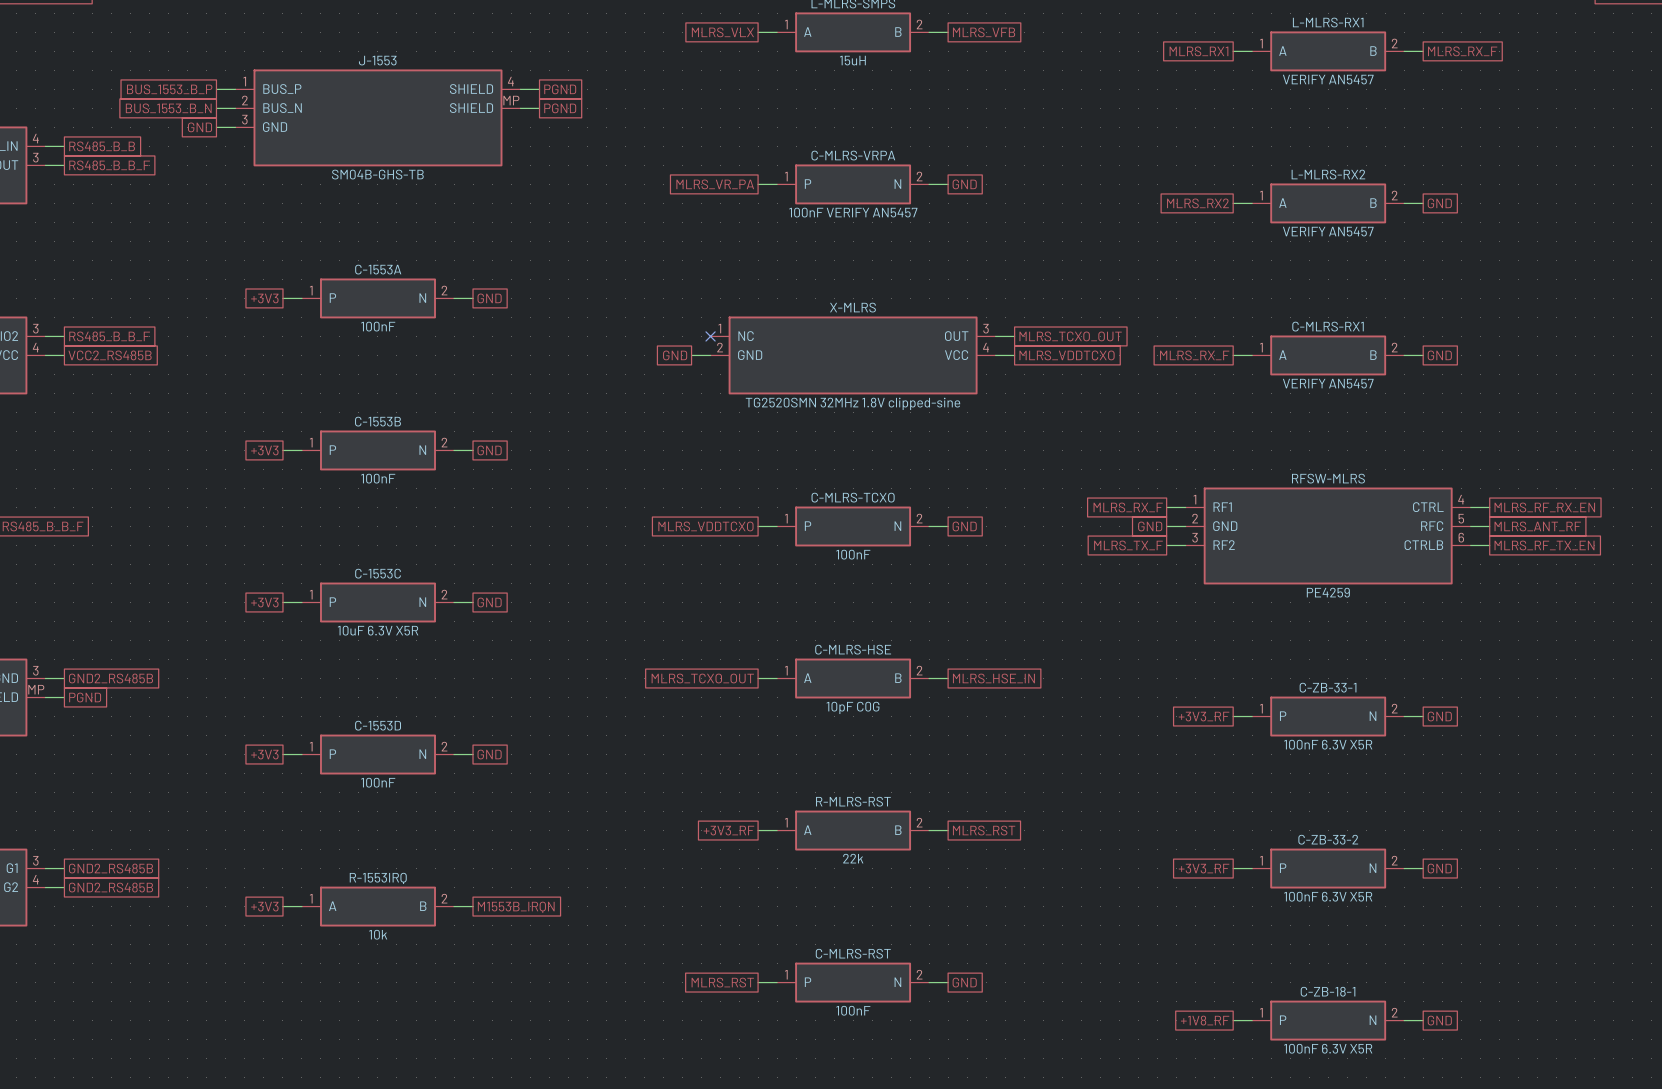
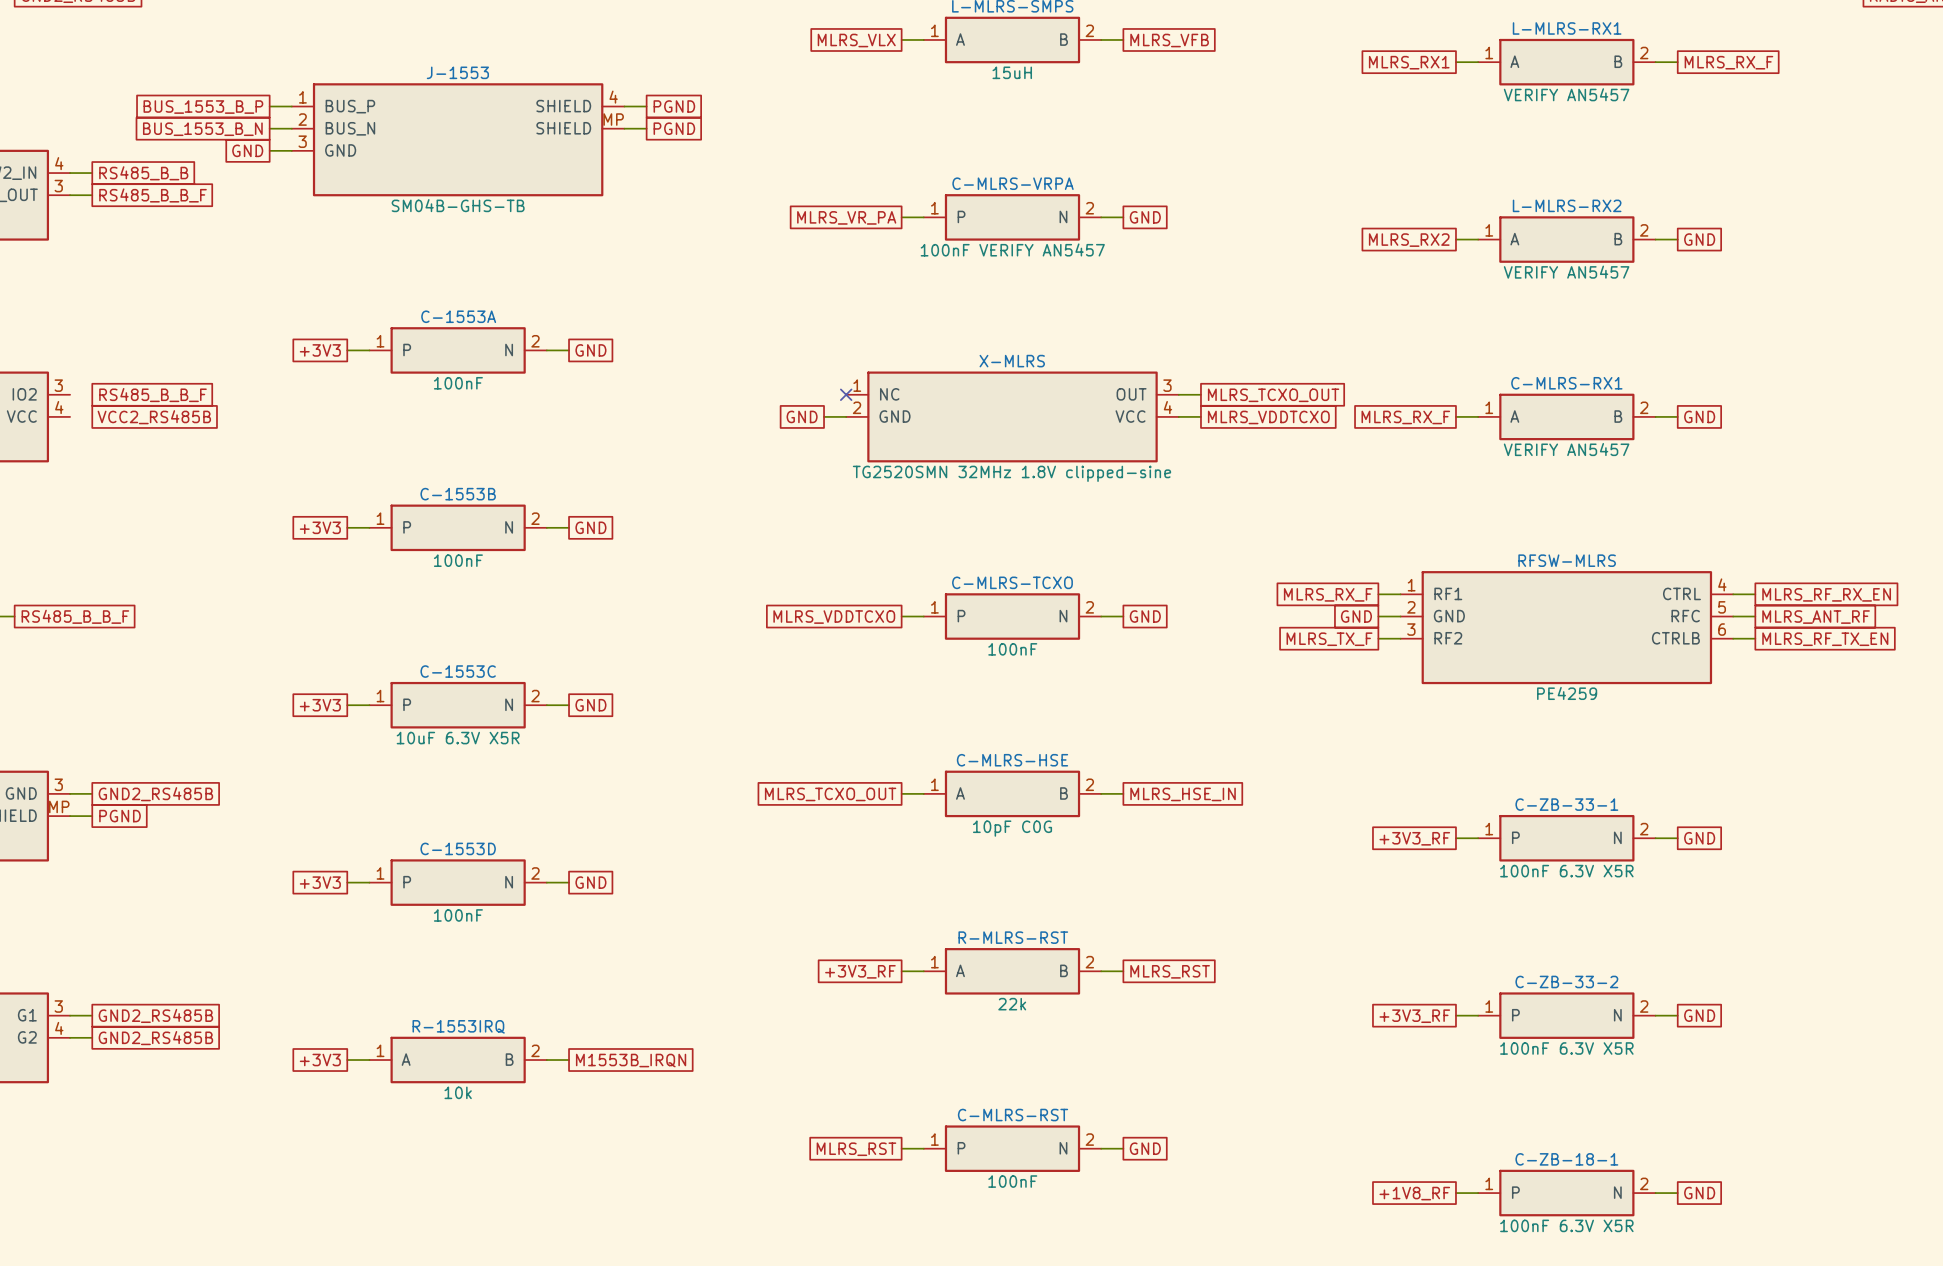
wire: (45, 336) (64, 336) -> none
wire: (45, 355) (64, 355) -> none

